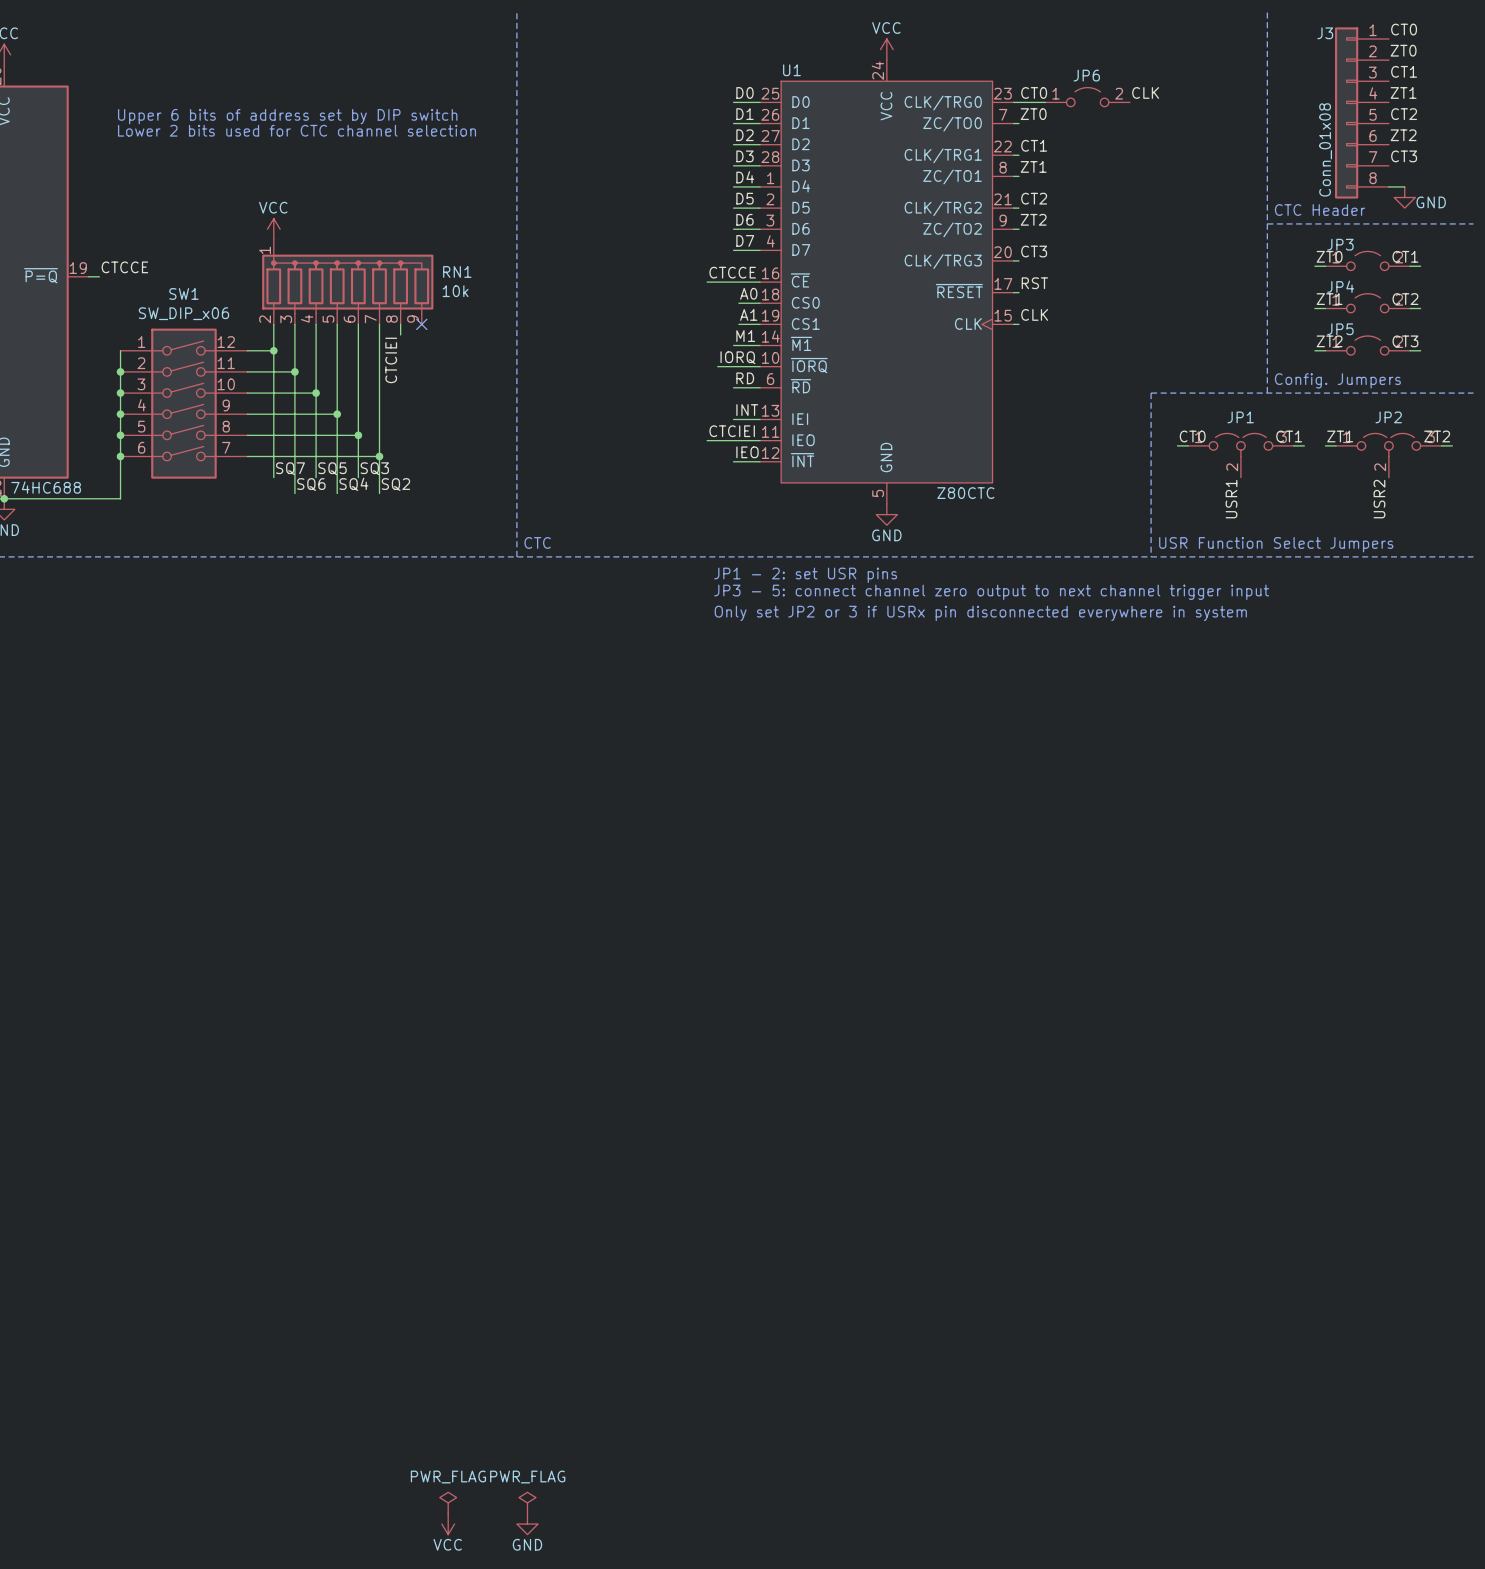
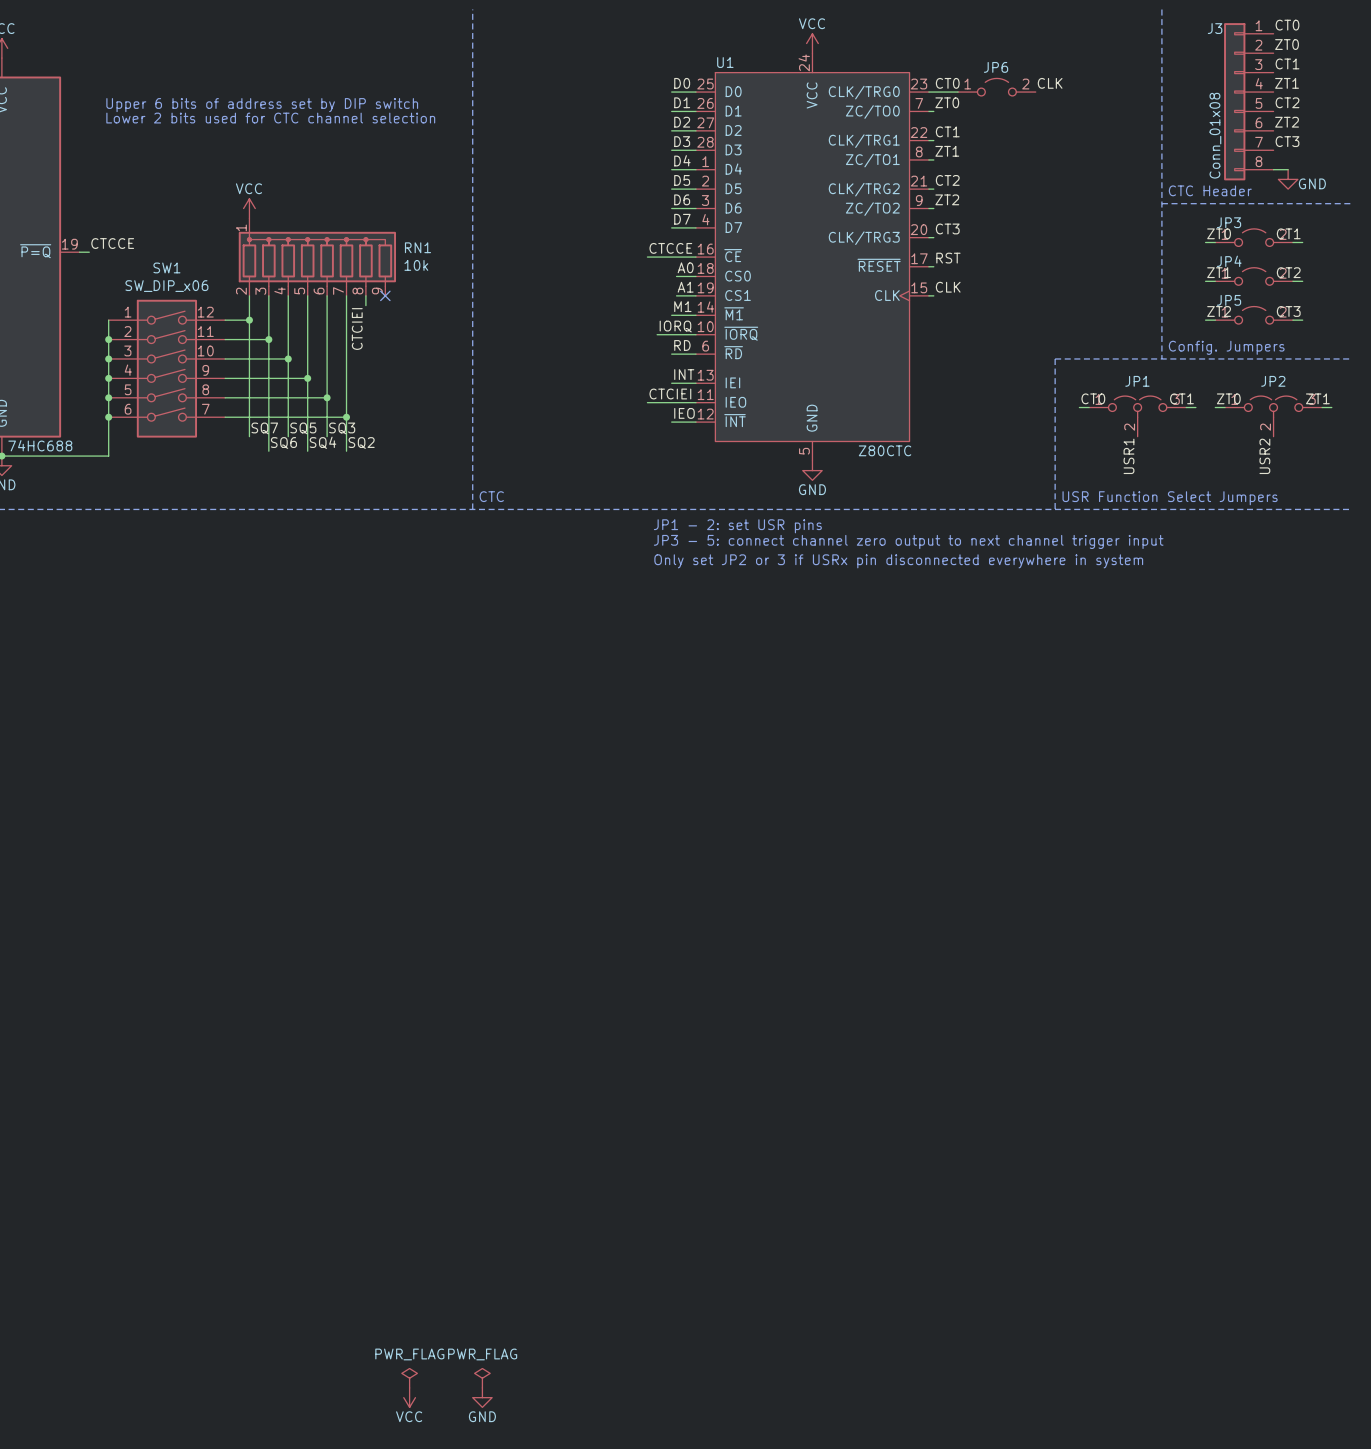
label: ZT1 (1340, 436) -> ZT0 (1228, 398)
label: ZT2 (1437, 436) -> ZT1 (1317, 398)

